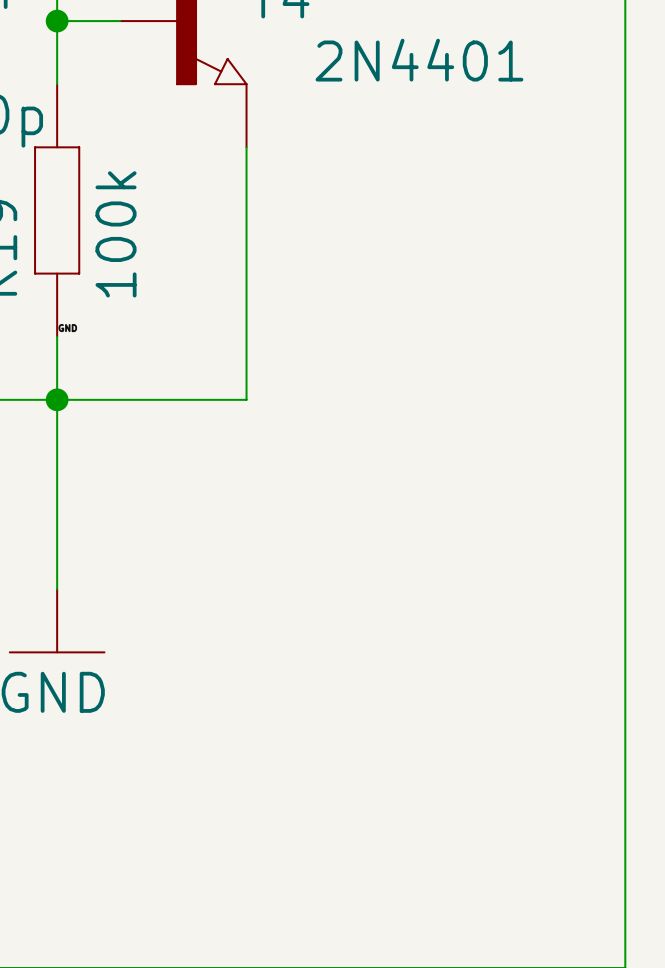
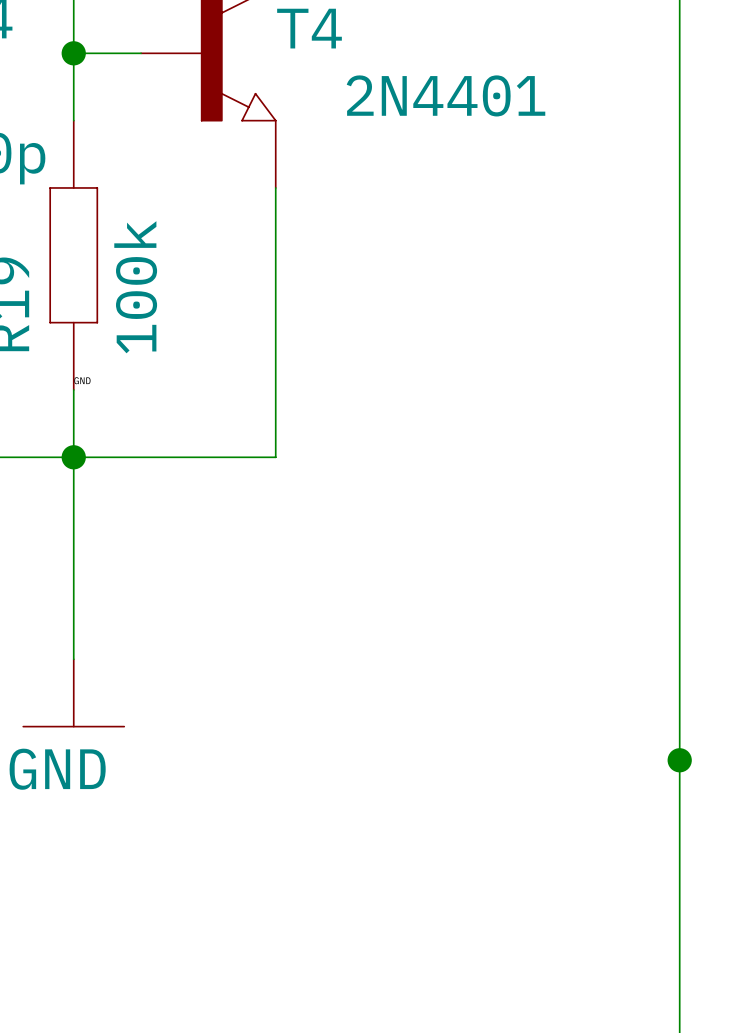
junction: none -> (679, 760)

